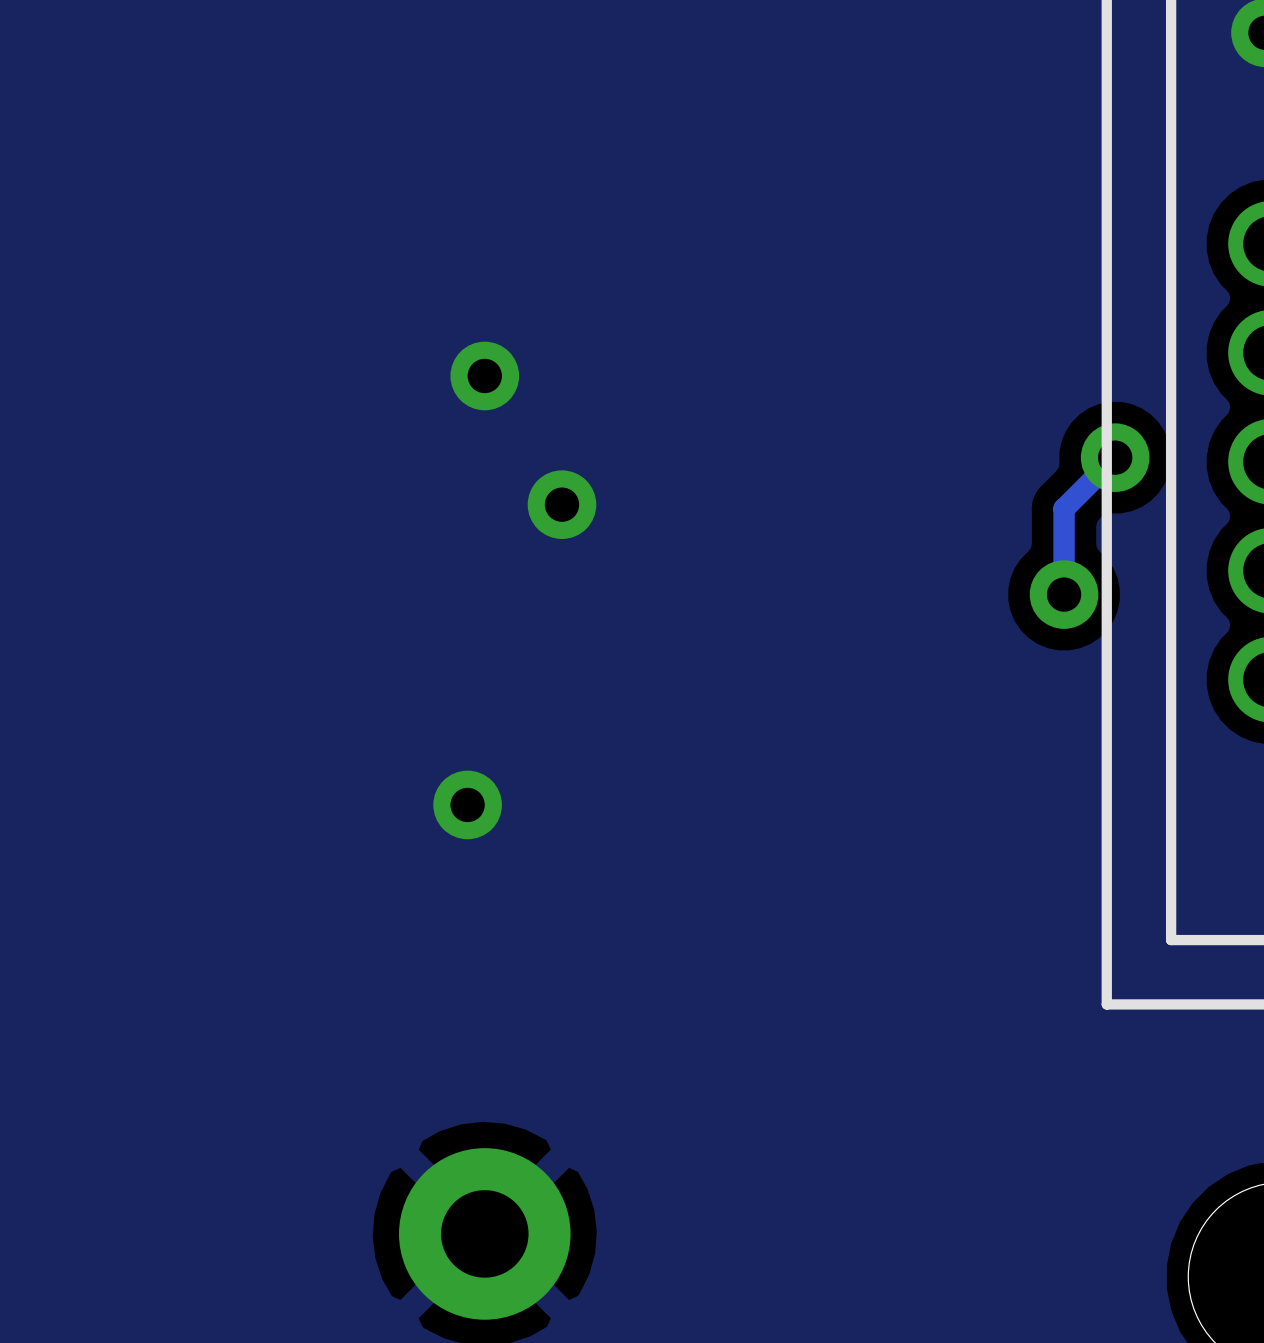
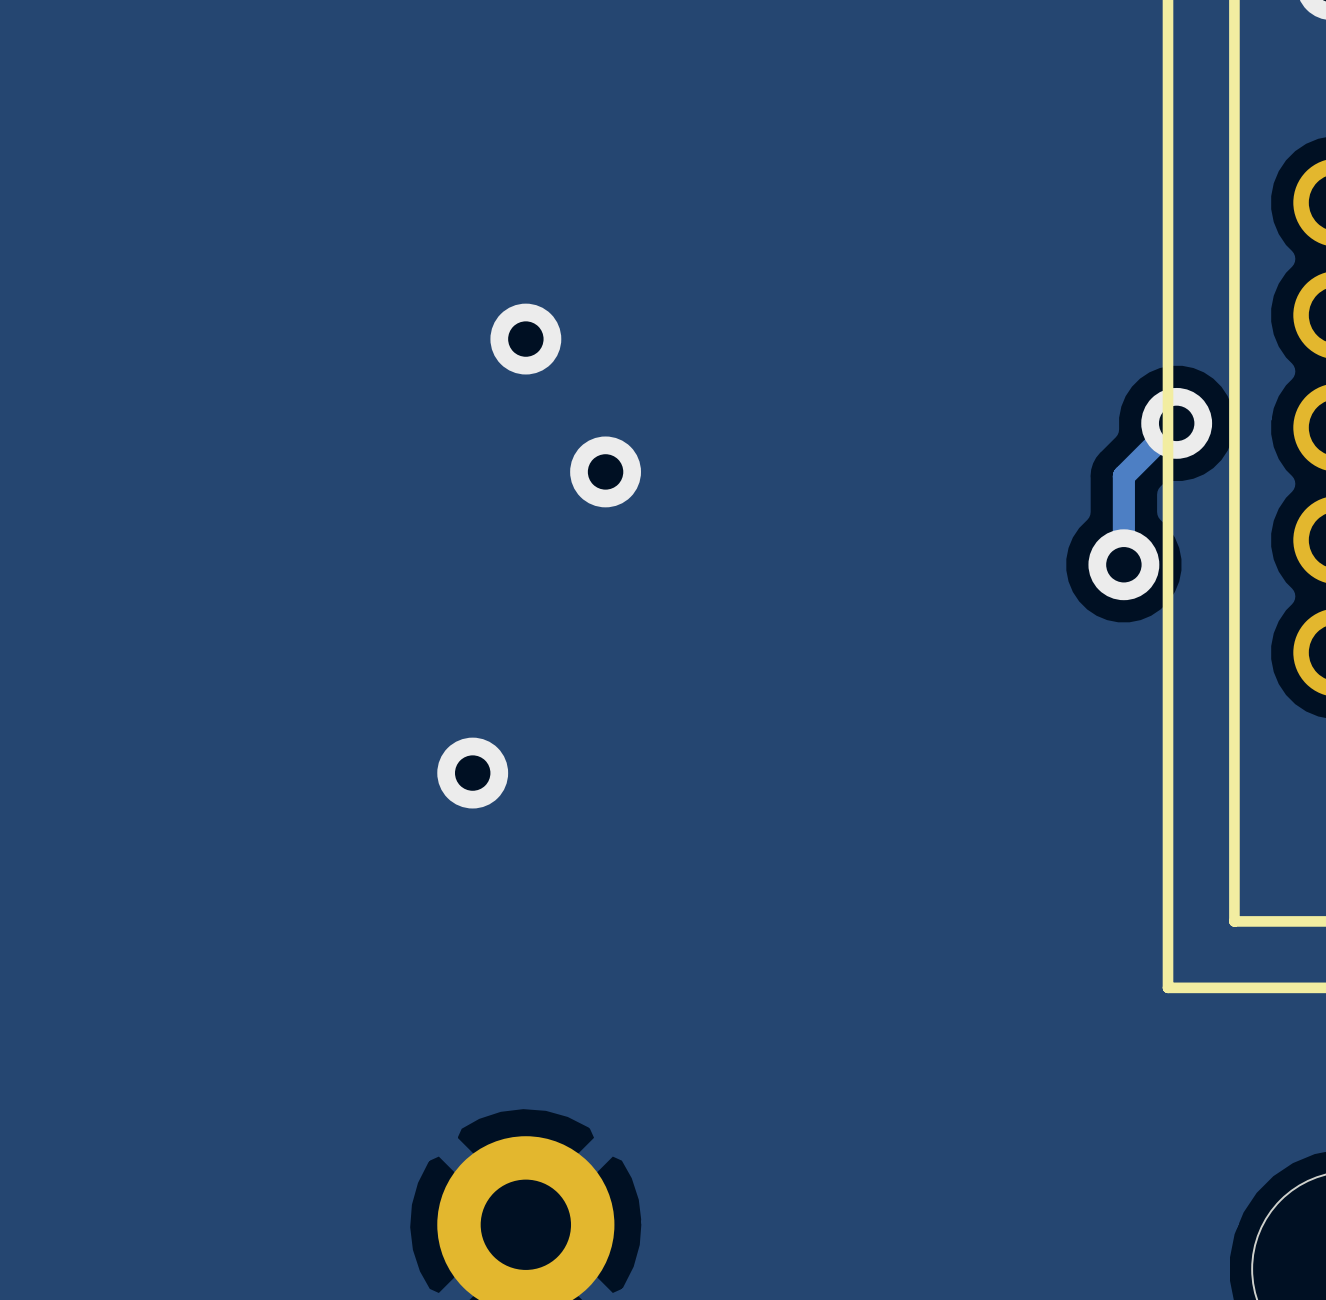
via position: (467, 804) -> (472, 773)

